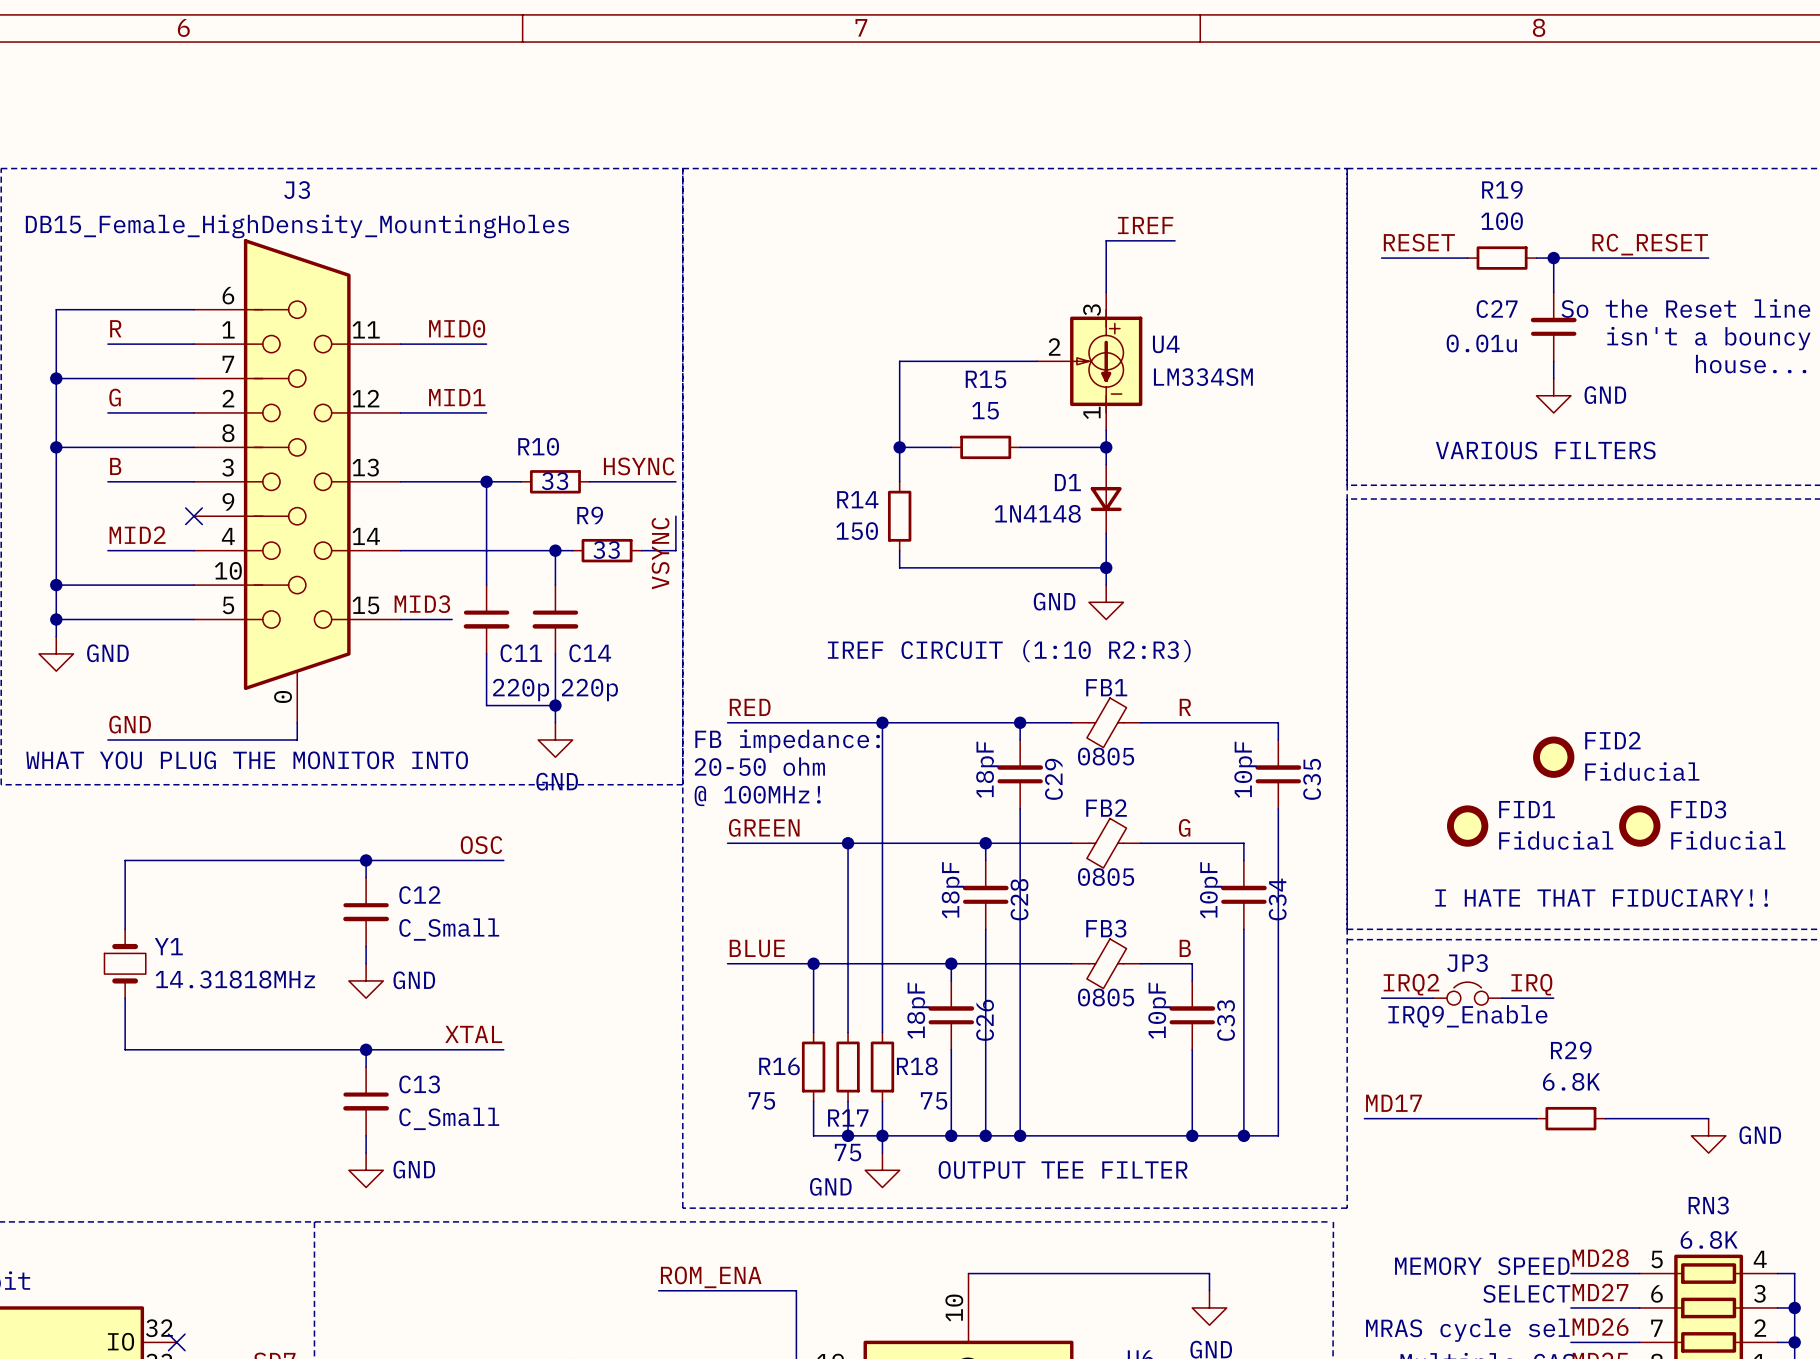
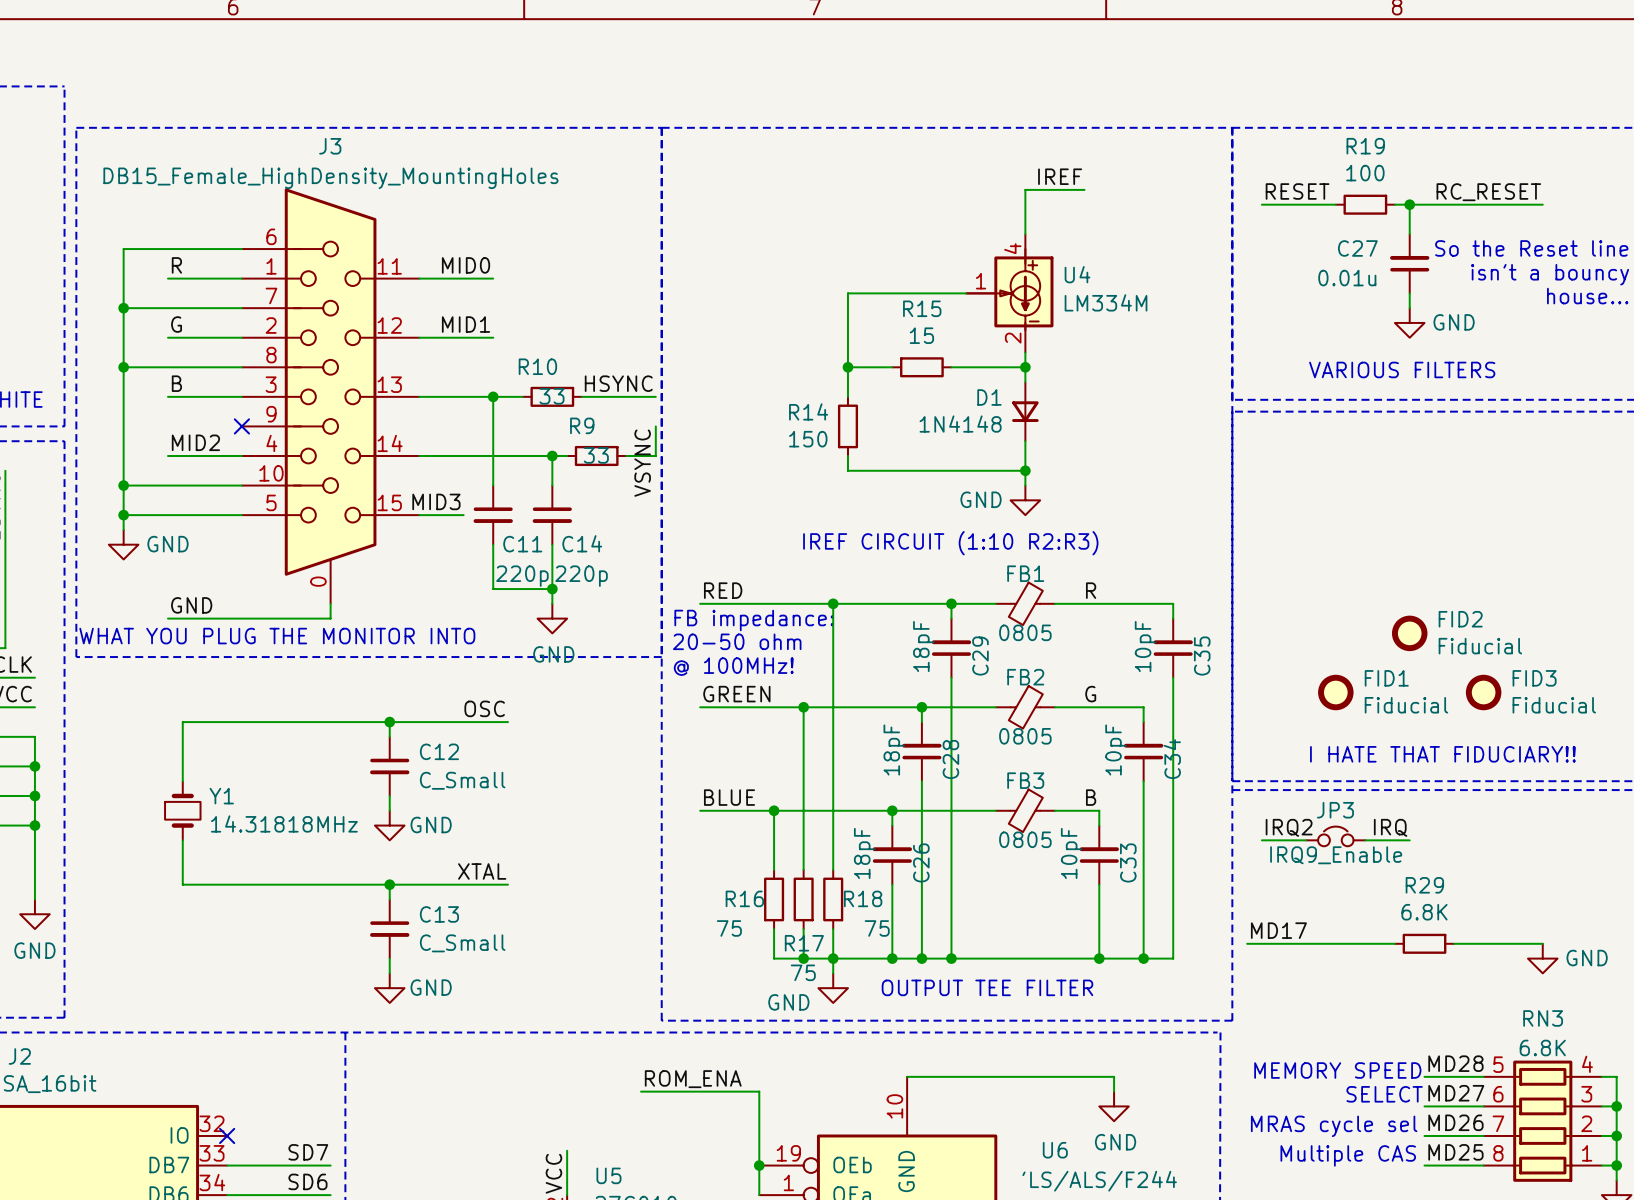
U4 symbol: [1037, 292, 1143, 431] -> [966, 234, 1054, 353]
U4 value: LM334SM (1203, 377) -> LM334M (1106, 302)

